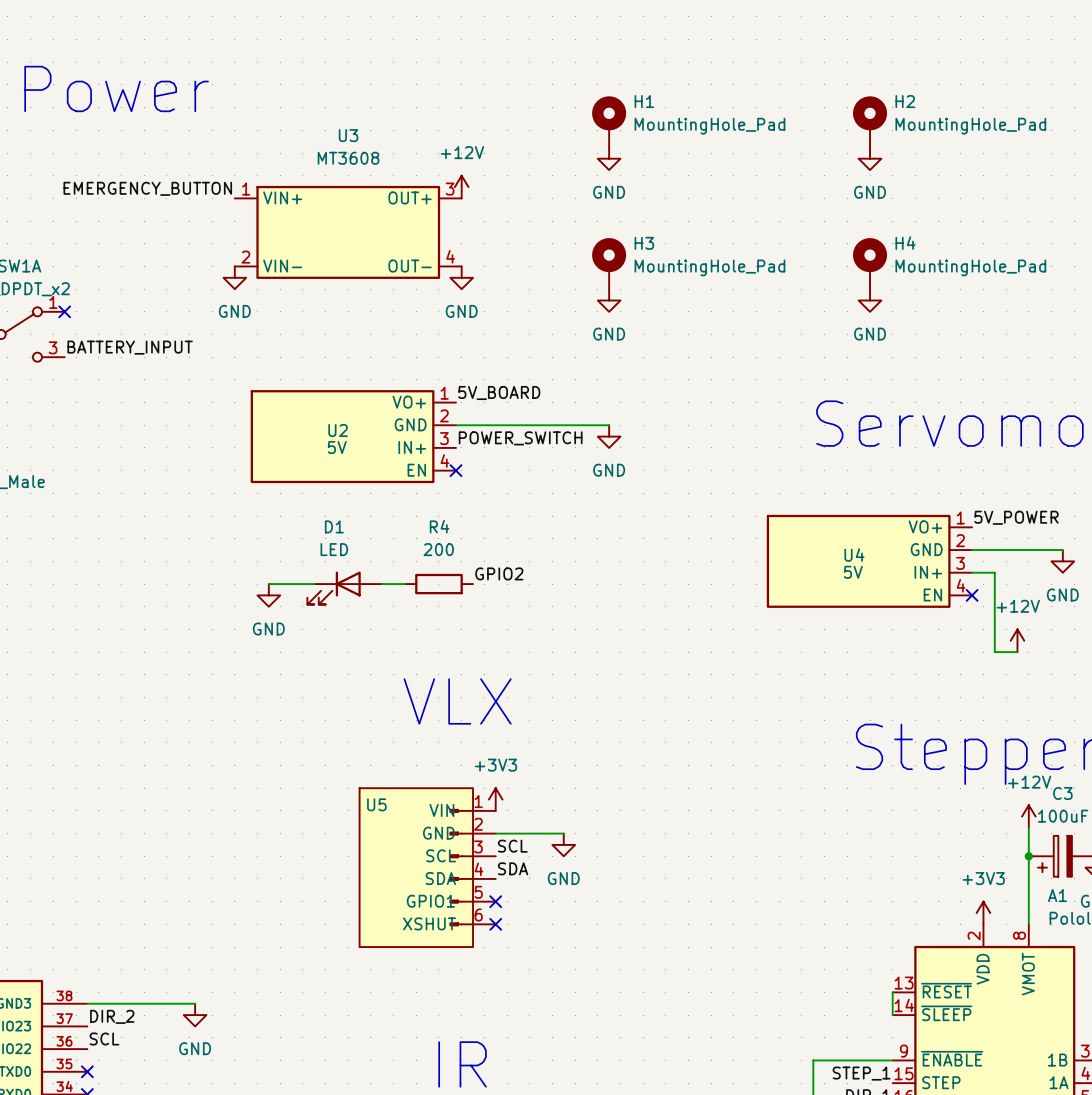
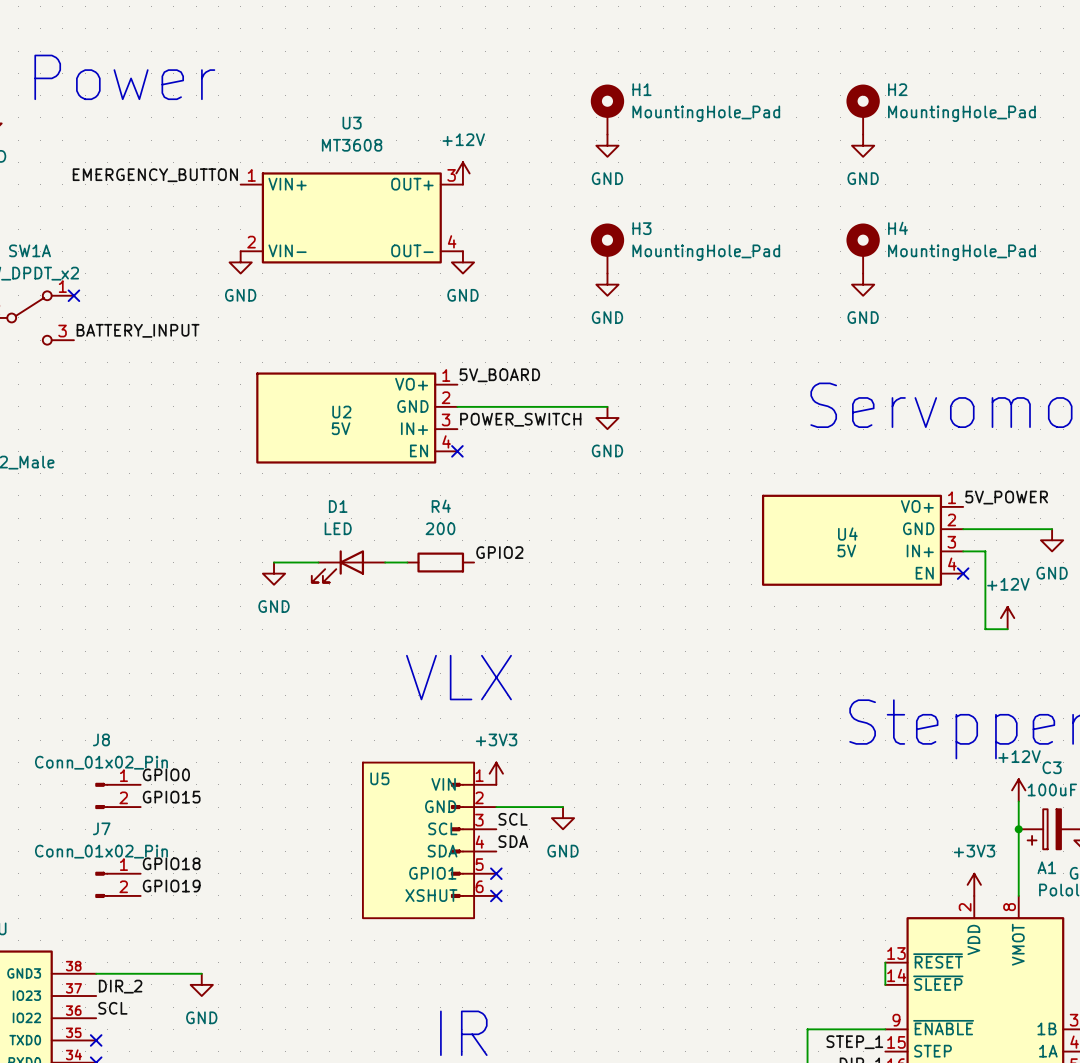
label: none -> GPIO0 (166, 774)
J8: none -> Conn_01x02_Pin (118, 795)
label: none -> GPIO15 (171, 797)
label: none -> GPIO18 (171, 863)
J7: none -> Conn_01x02_Pin (118, 884)
label: none -> GPIO19 (171, 886)

